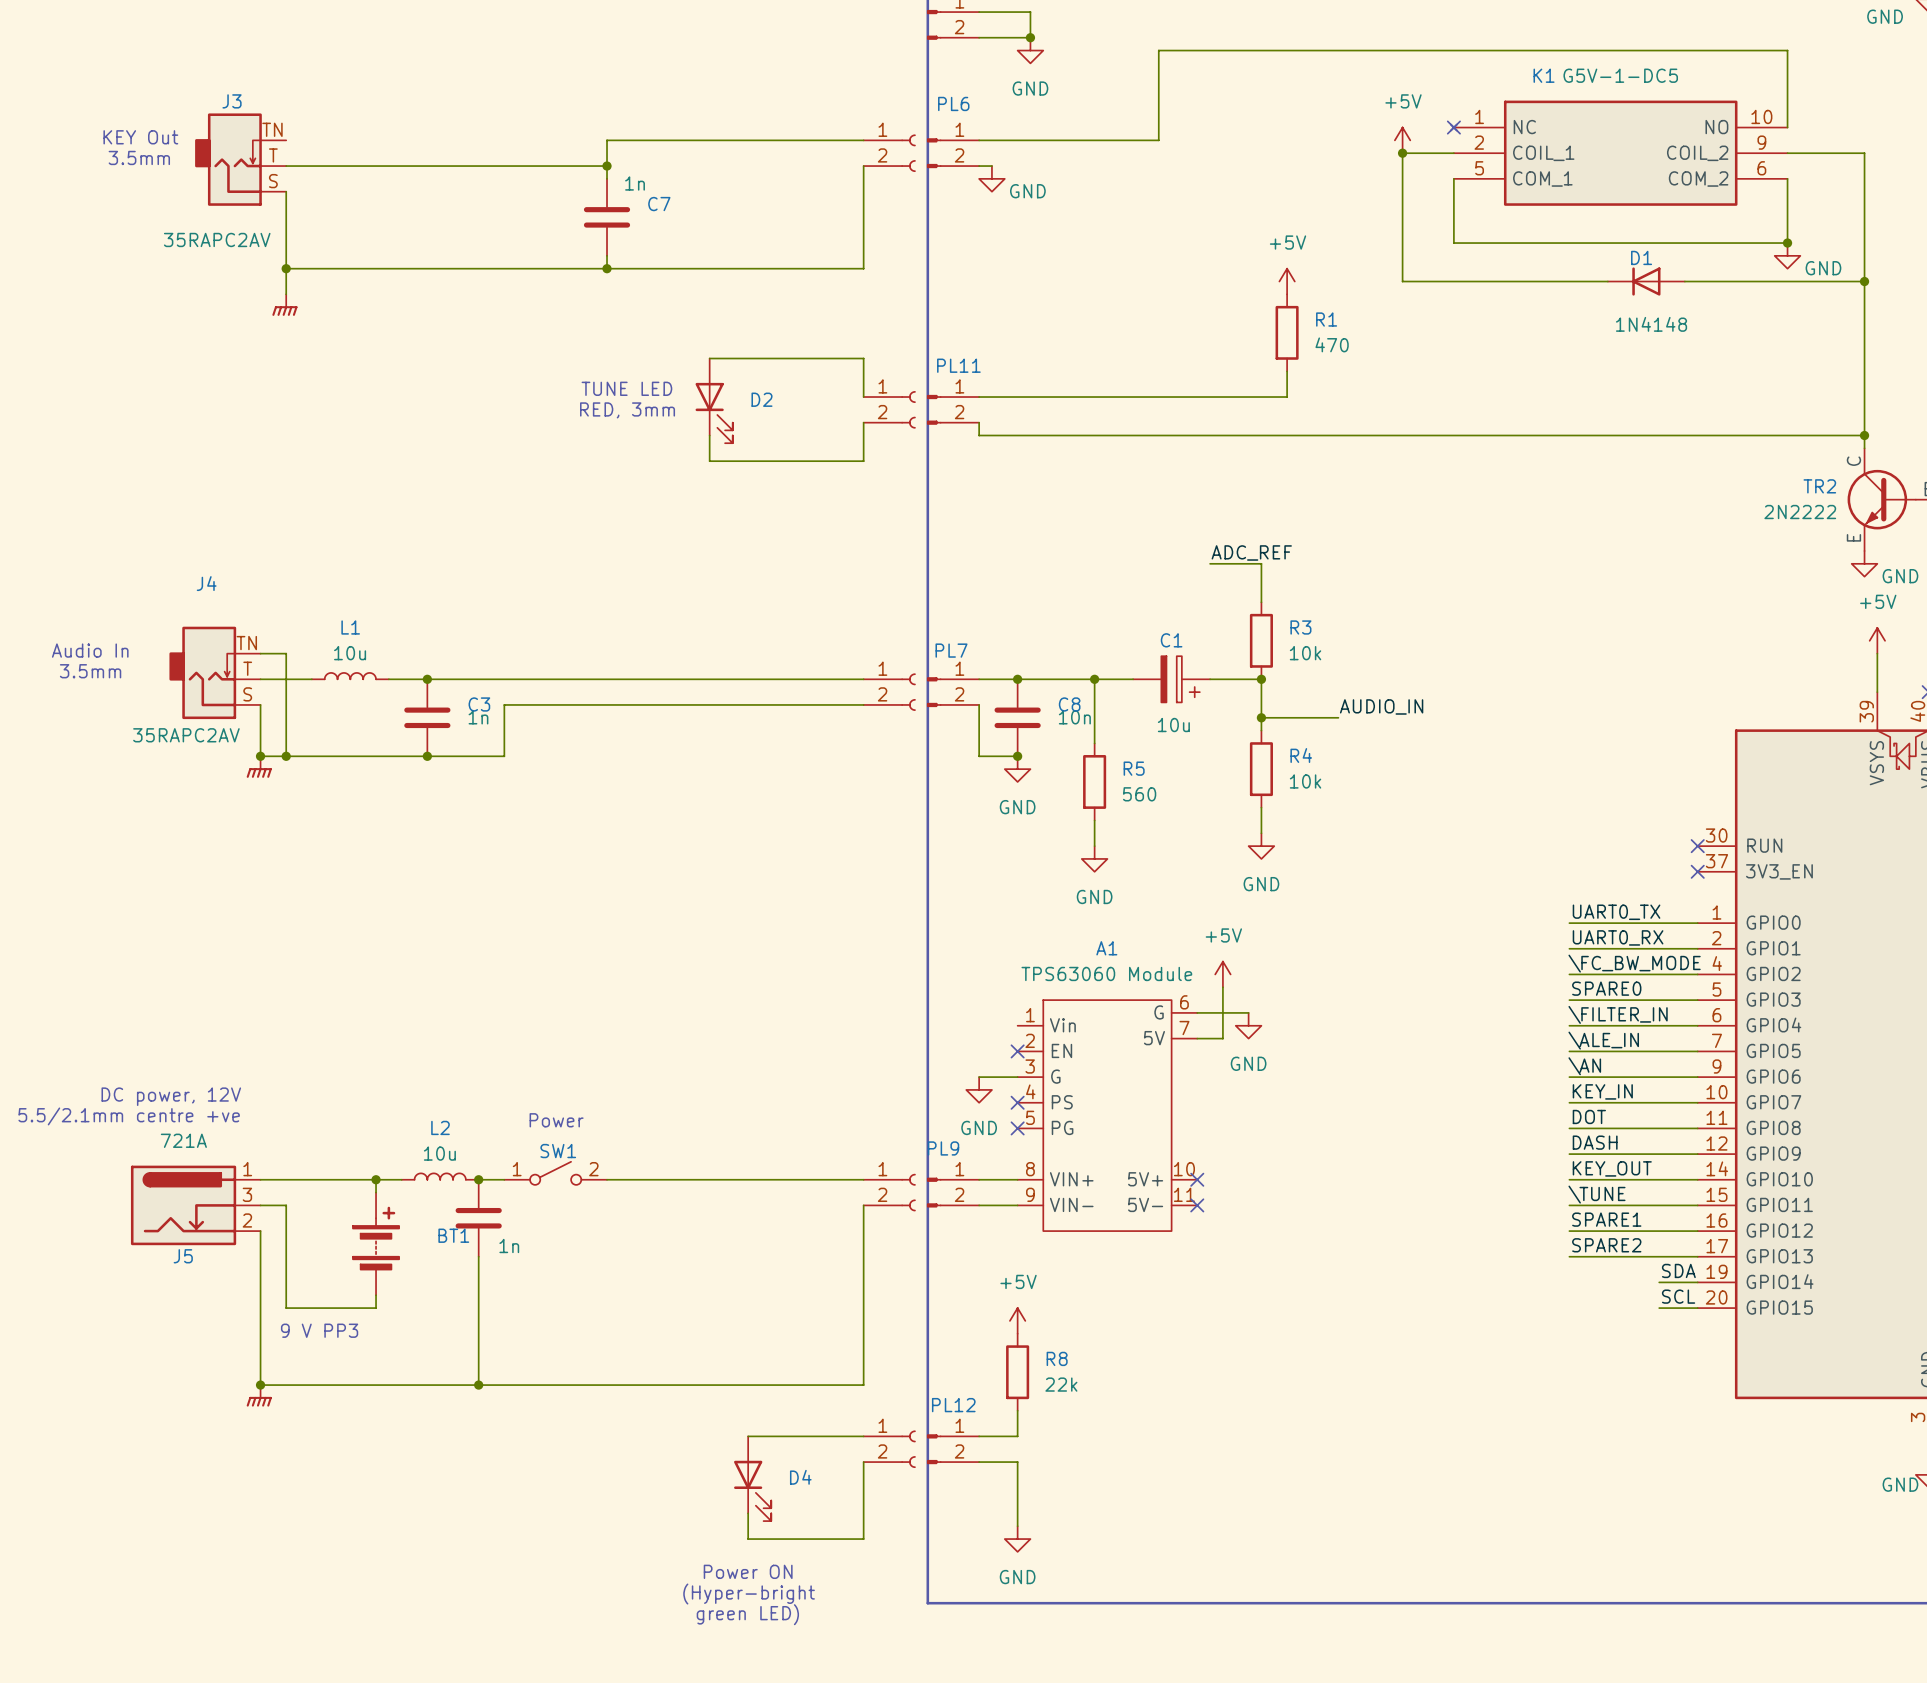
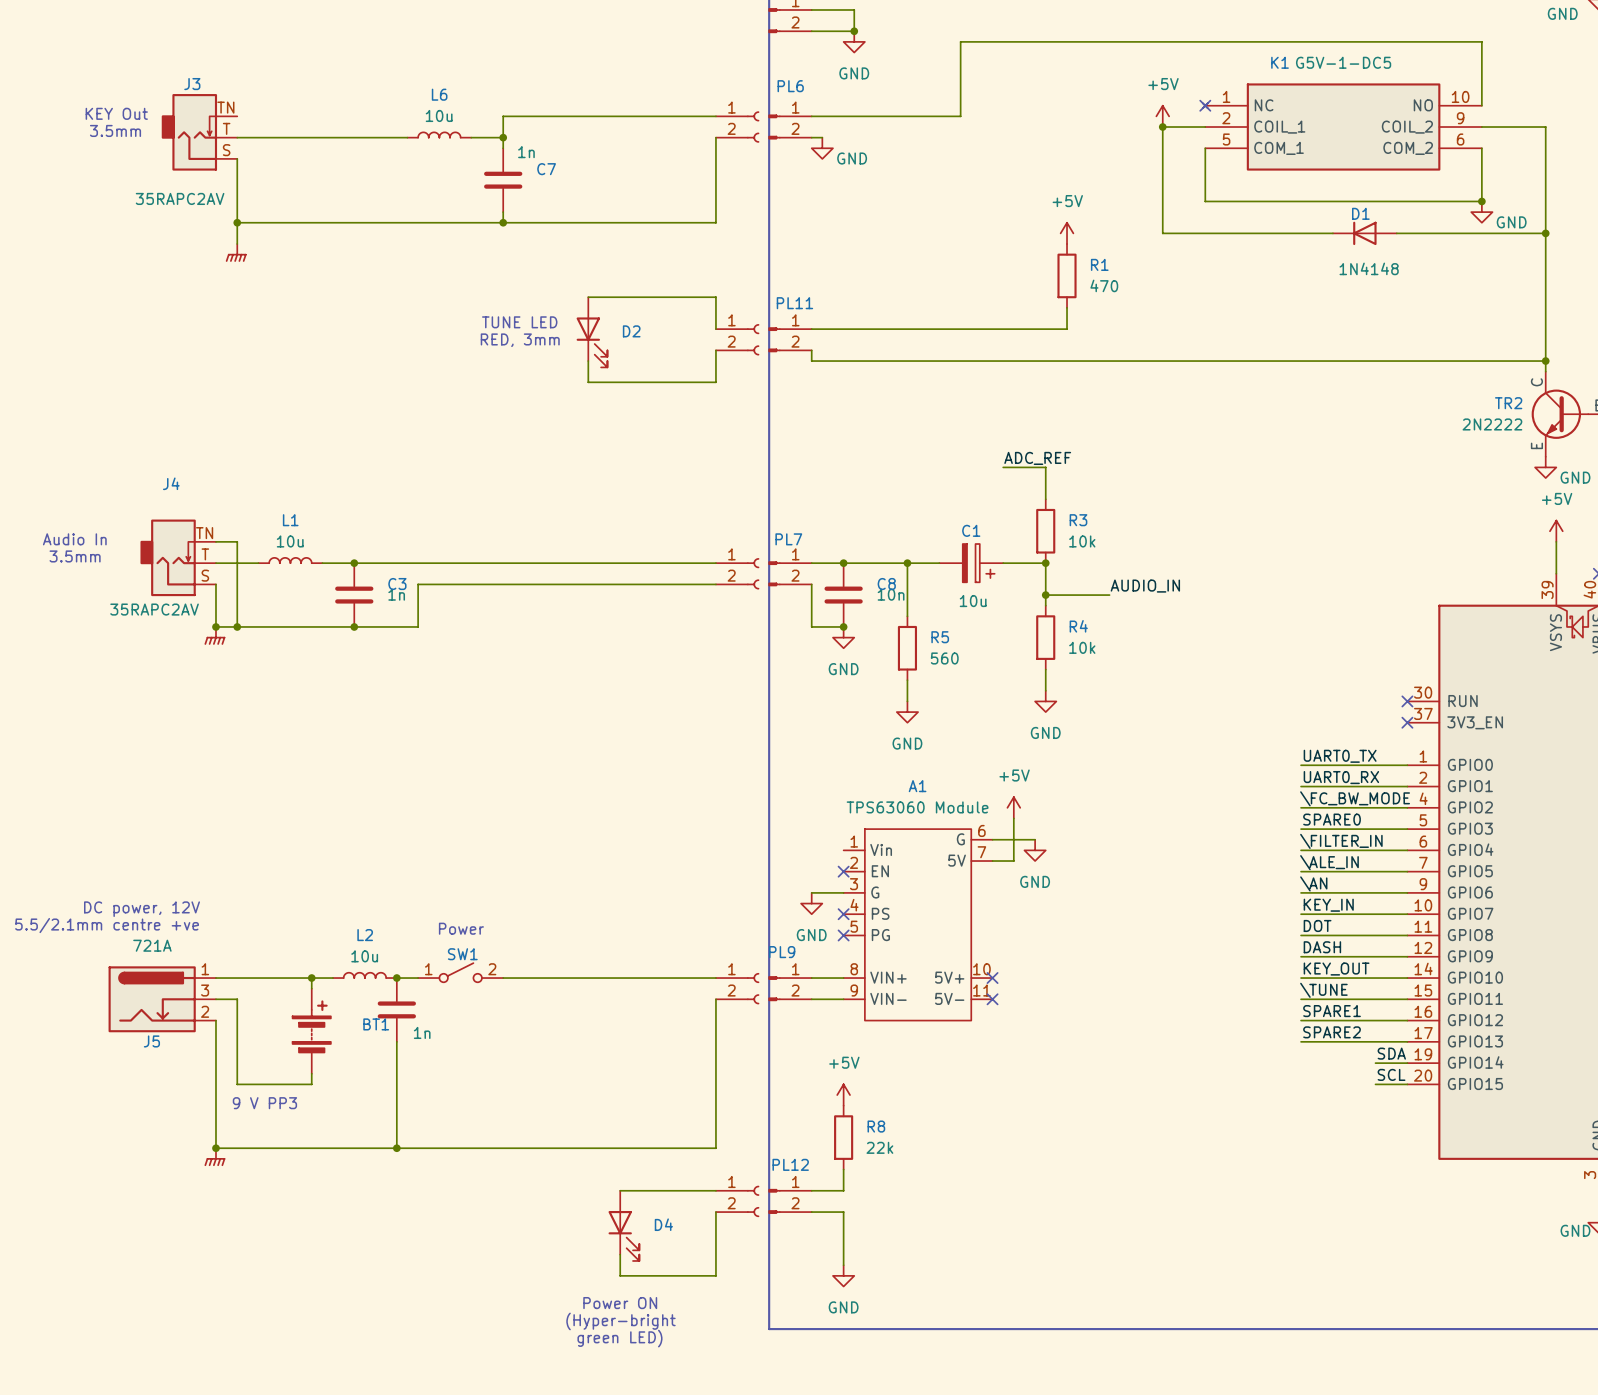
L6: none -> 10u (439, 134)
wire: (491, 166) (568, 166) -> none

